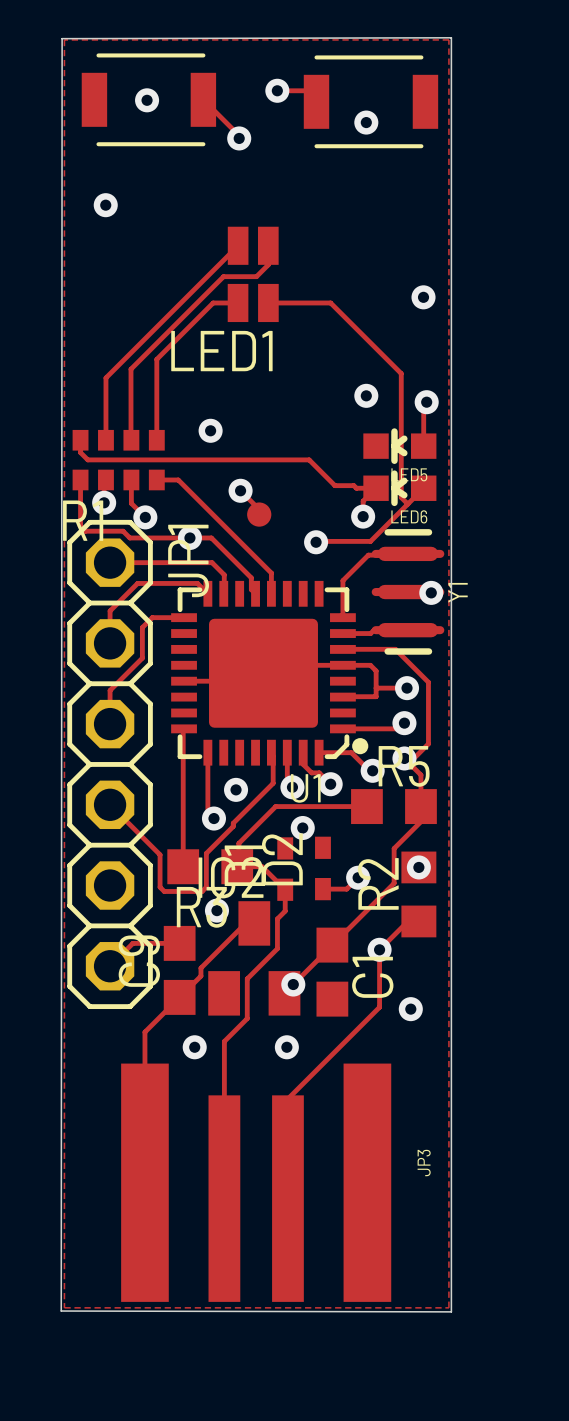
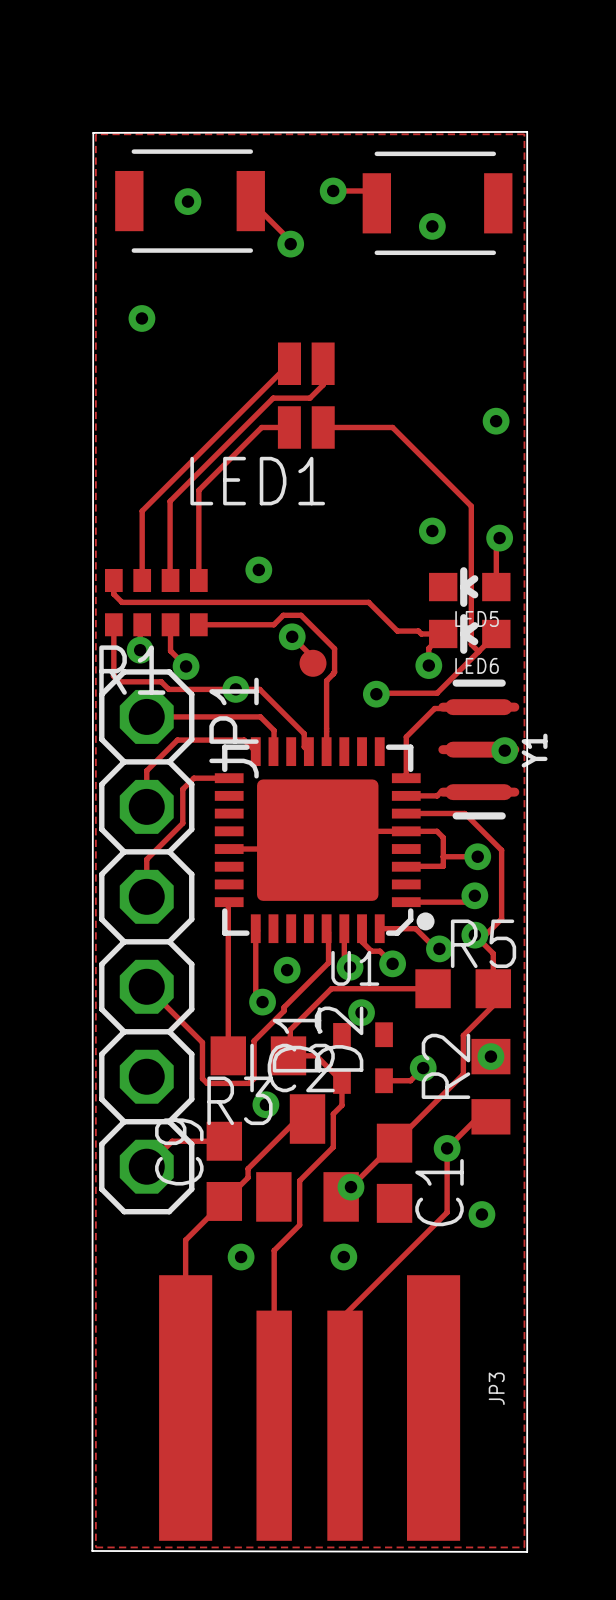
track: (178, 479) (271, 573) -> (222, 624) (273, 624) (283, 615) (301, 615) (334, 648) (333, 673)
track: none -> (333, 673) (326, 680) (326, 728)

